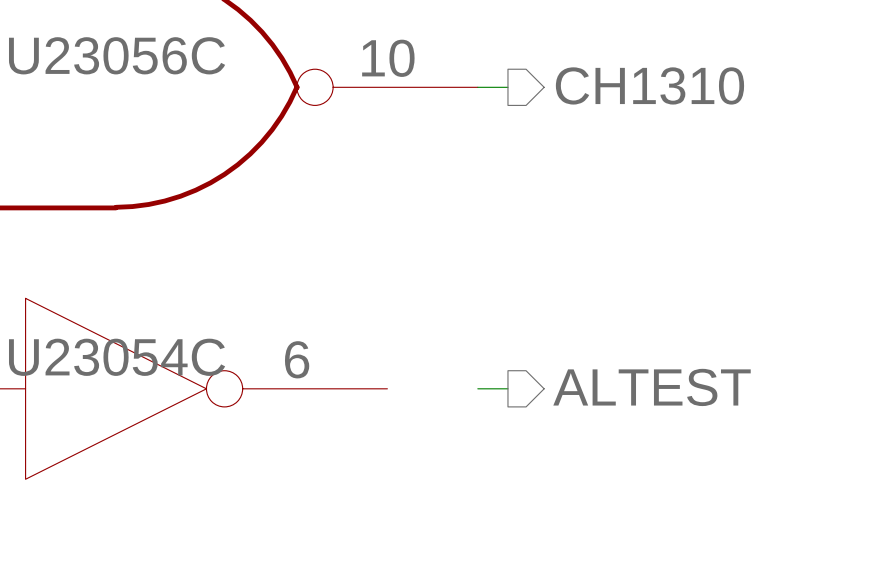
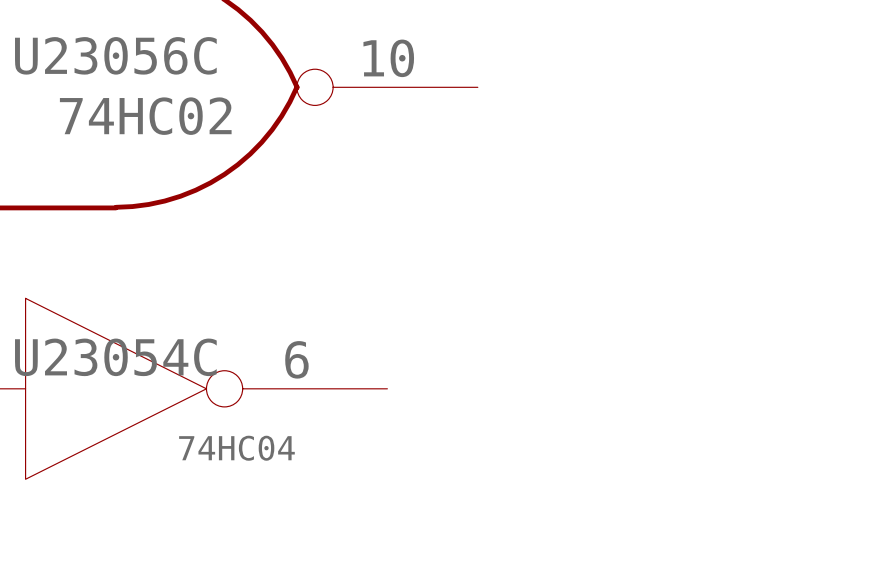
hierarchical label: CH1310 (649, 85) -> none
wire: (477, 87) (507, 87) -> none
U23056C value: none -> 74HC02 (145, 116)
hierarchical label: ALTEST (652, 387) -> none
wire: (477, 388) (507, 388) -> none
U23054C value: none -> 74HC04 (236, 448)

